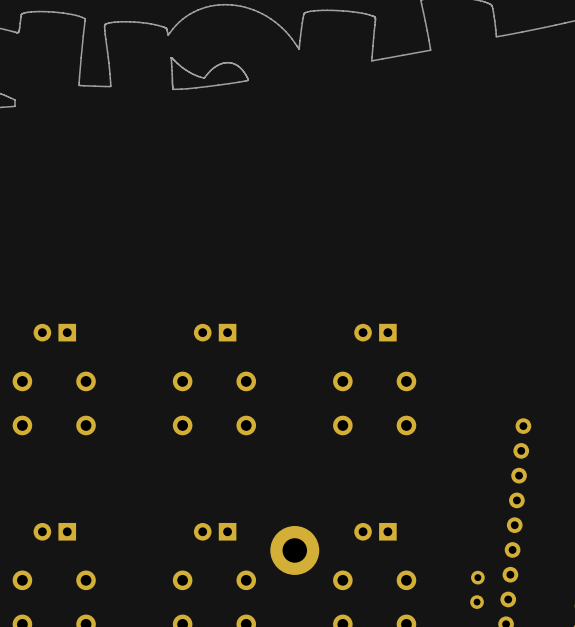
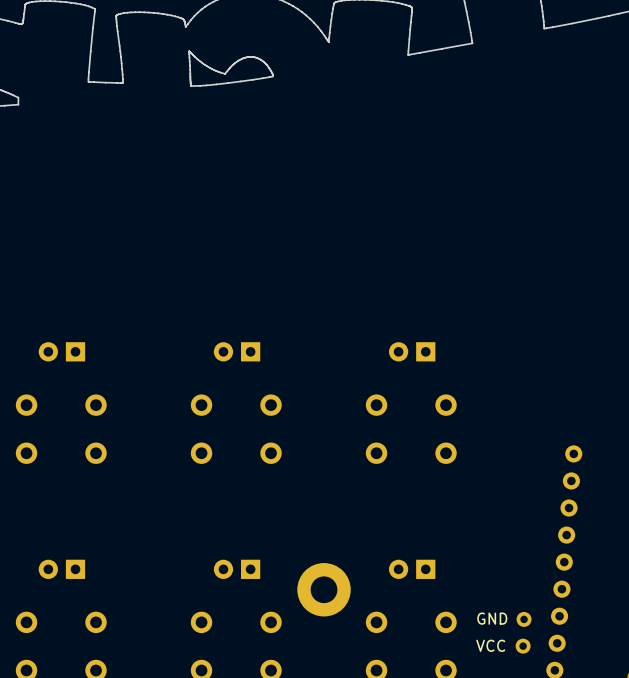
text: none -> GND (492, 618)
text: none -> VCC (490, 645)

